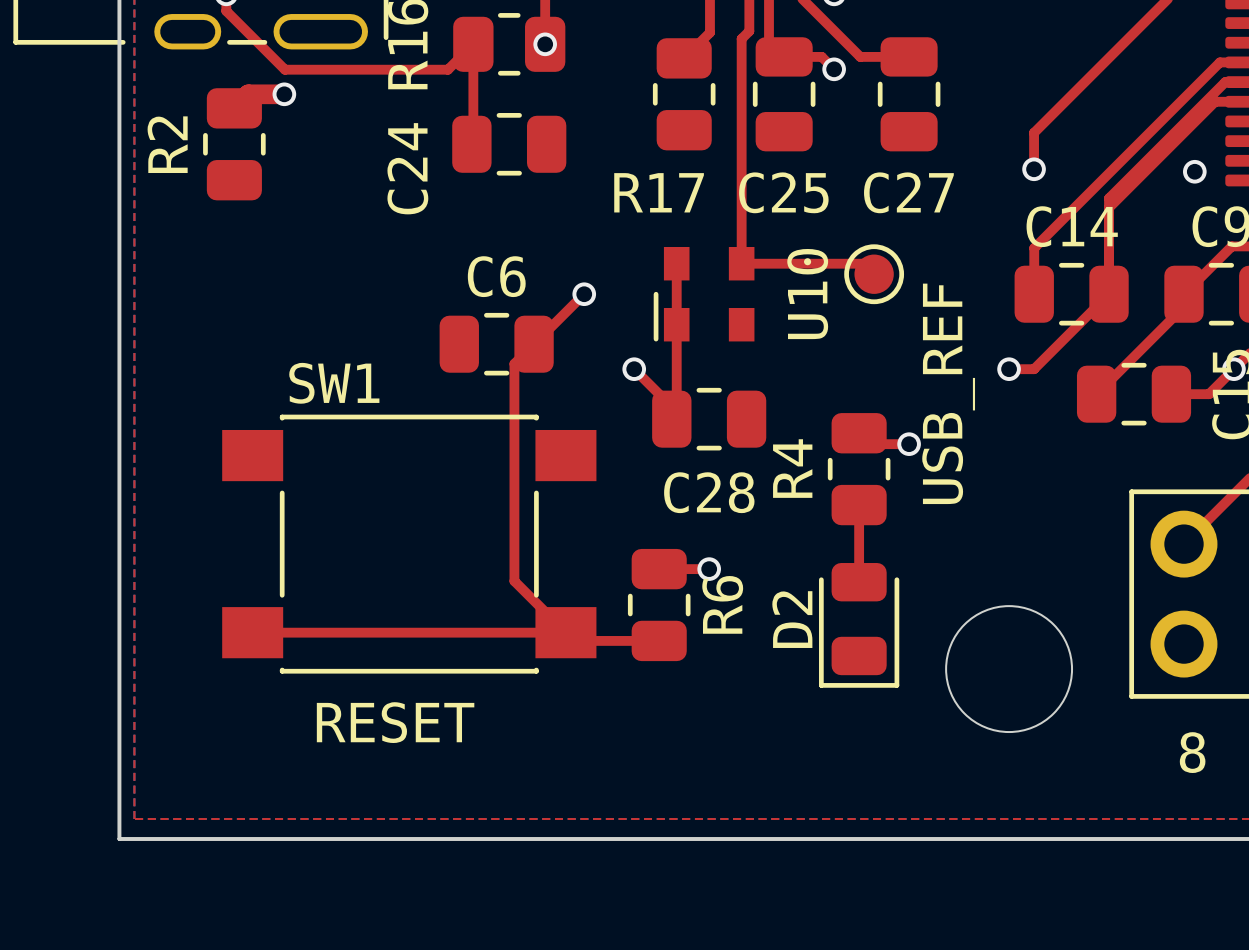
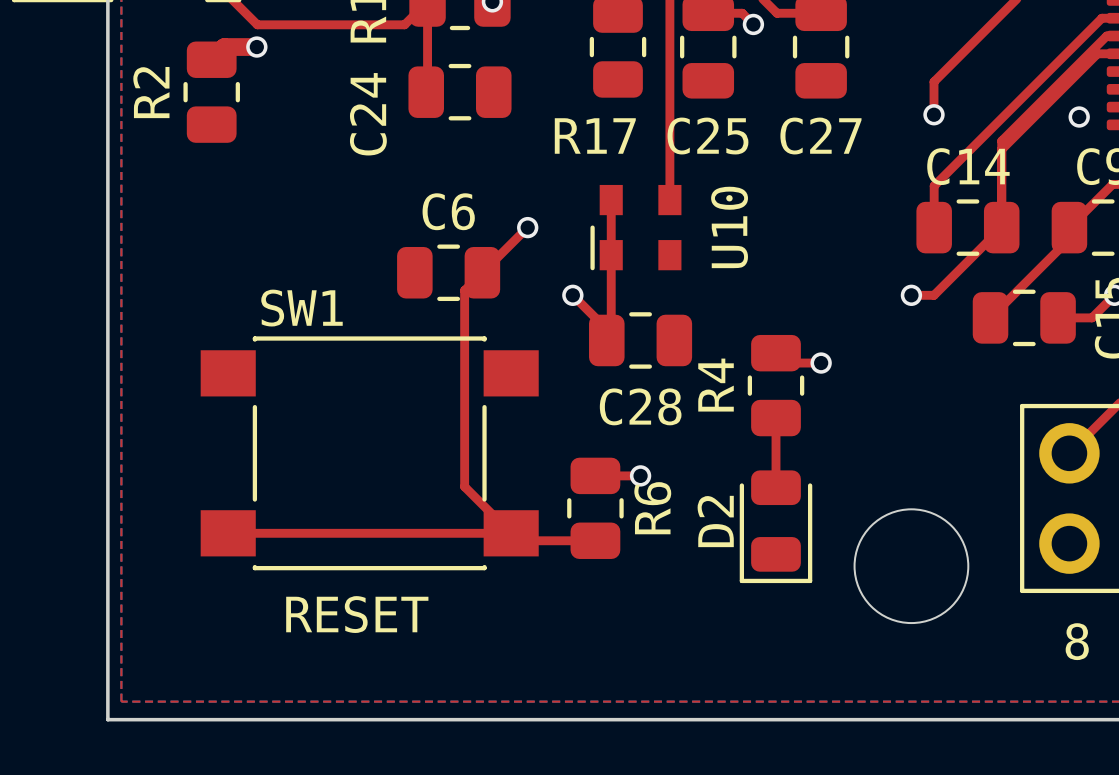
top track: (741, 263) (863, 263) (874, 274) -> none
USB_REF: (874, 274) -> none

